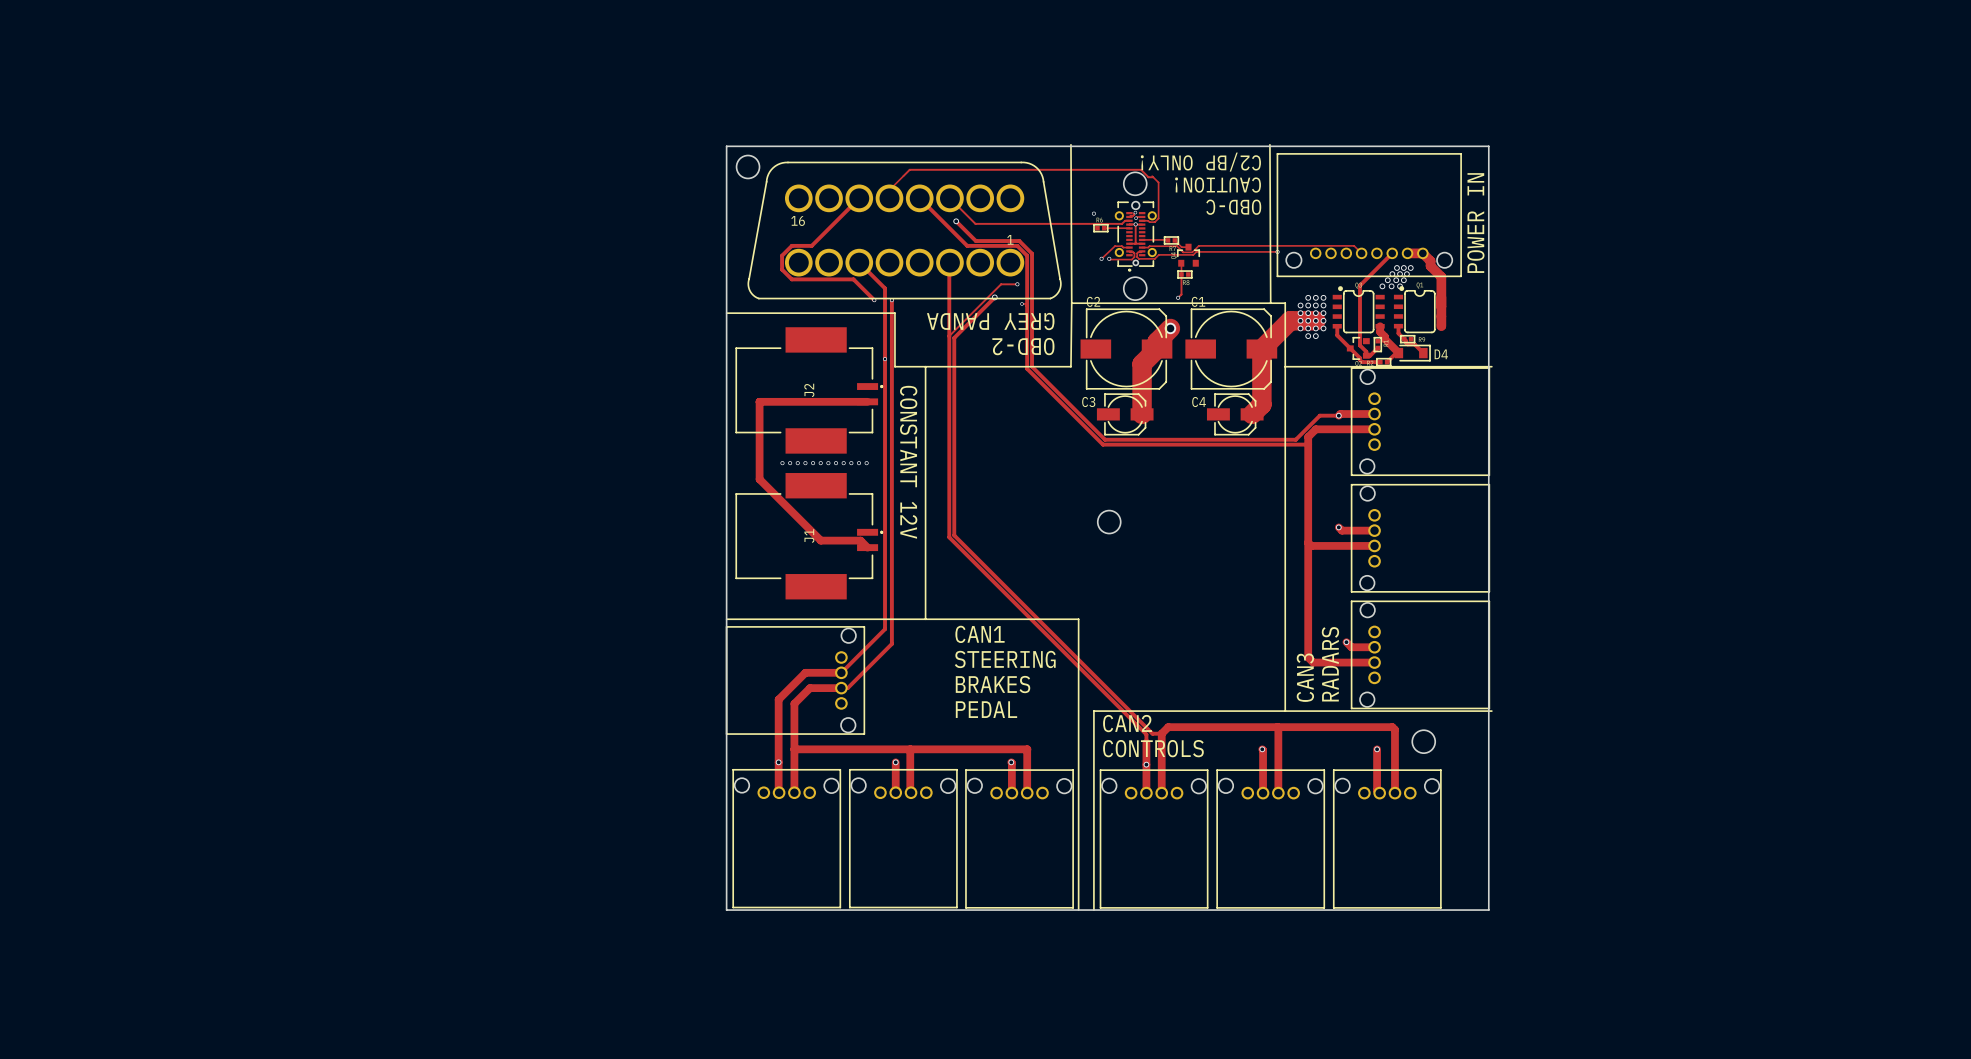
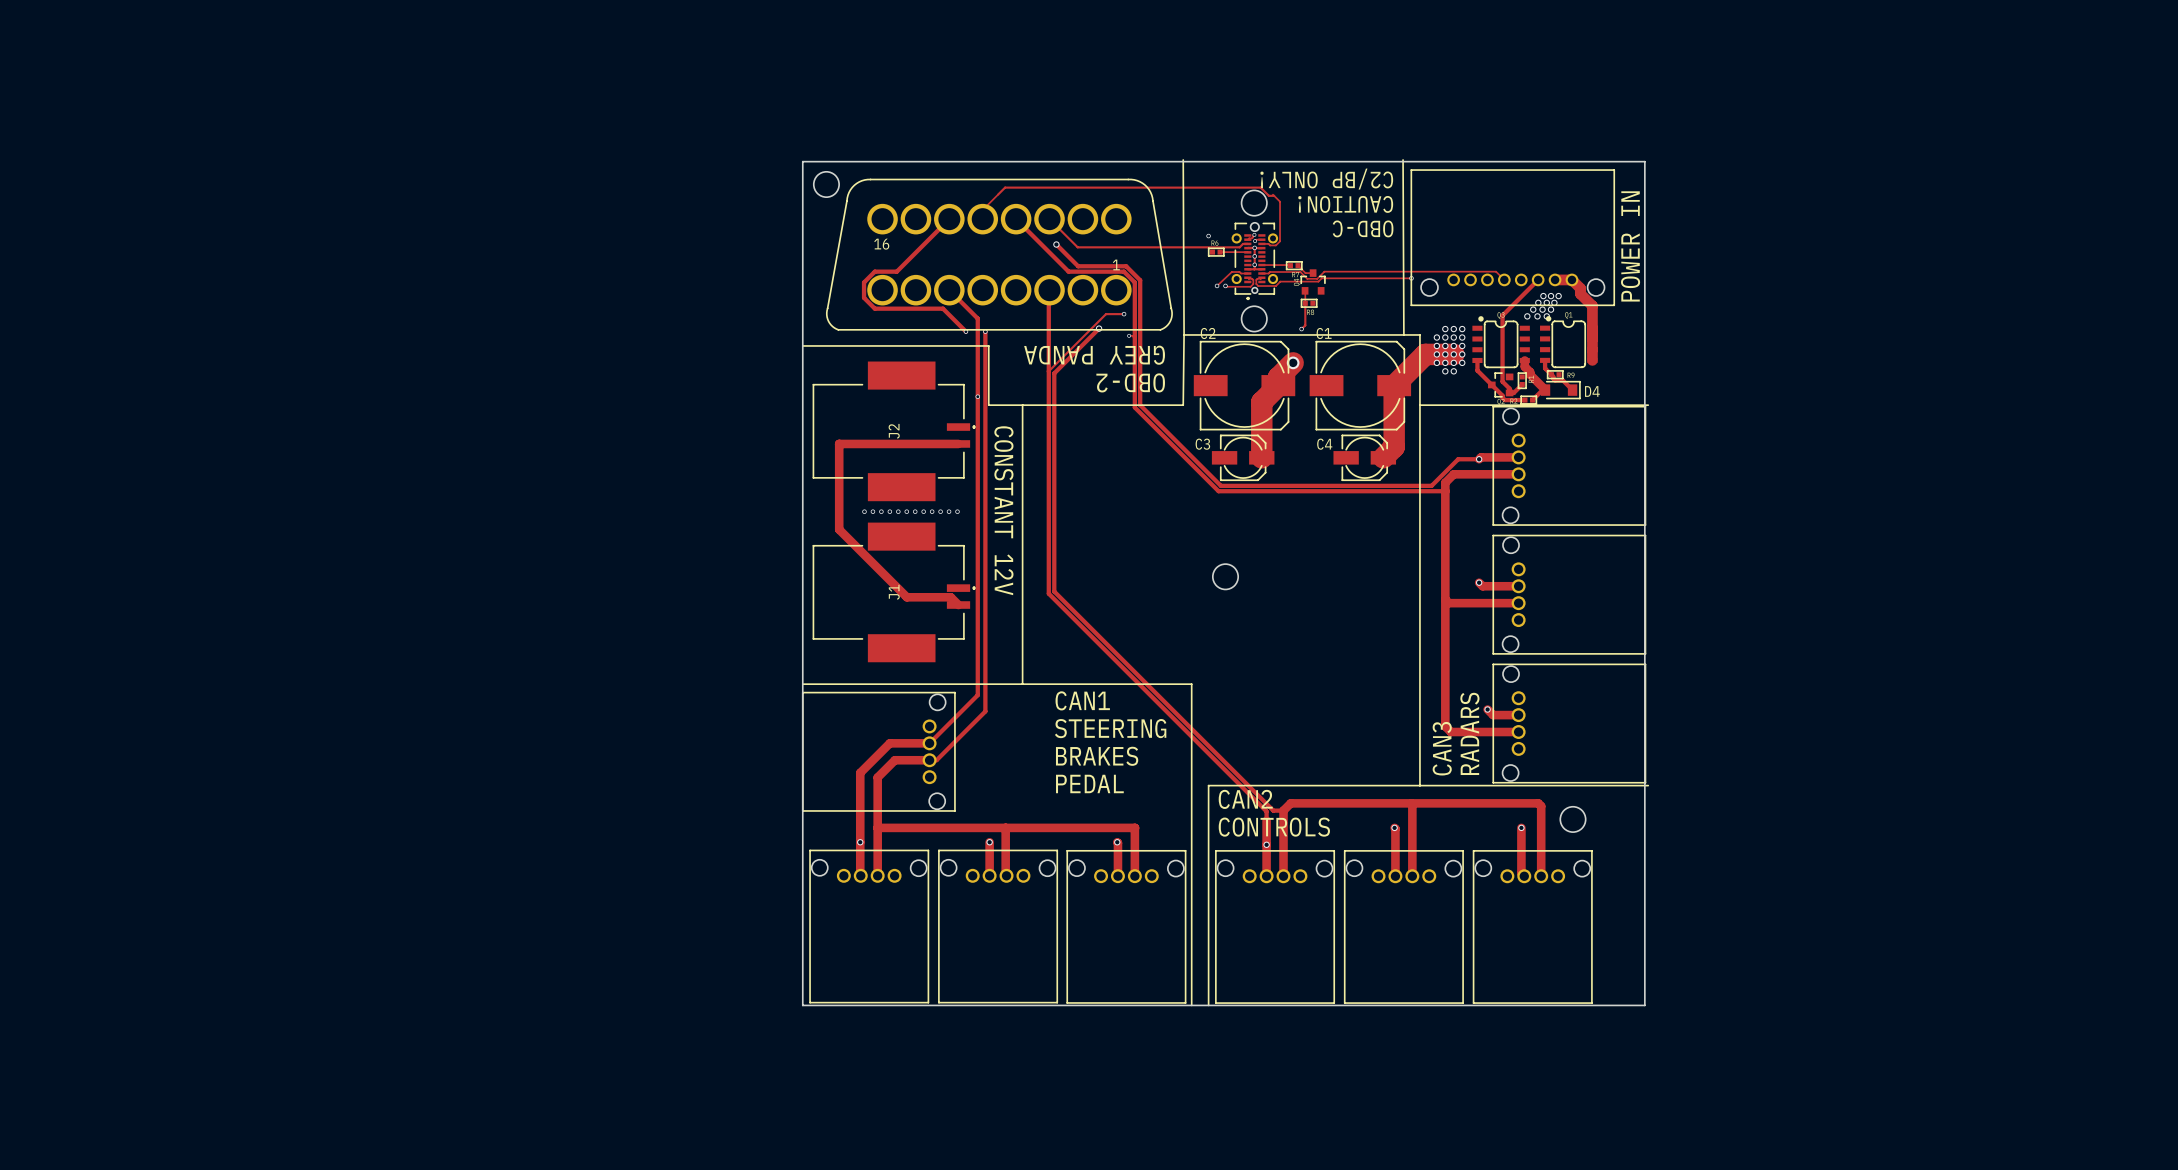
via: none -> (1254, 256)
via: none -> (1254, 264)

